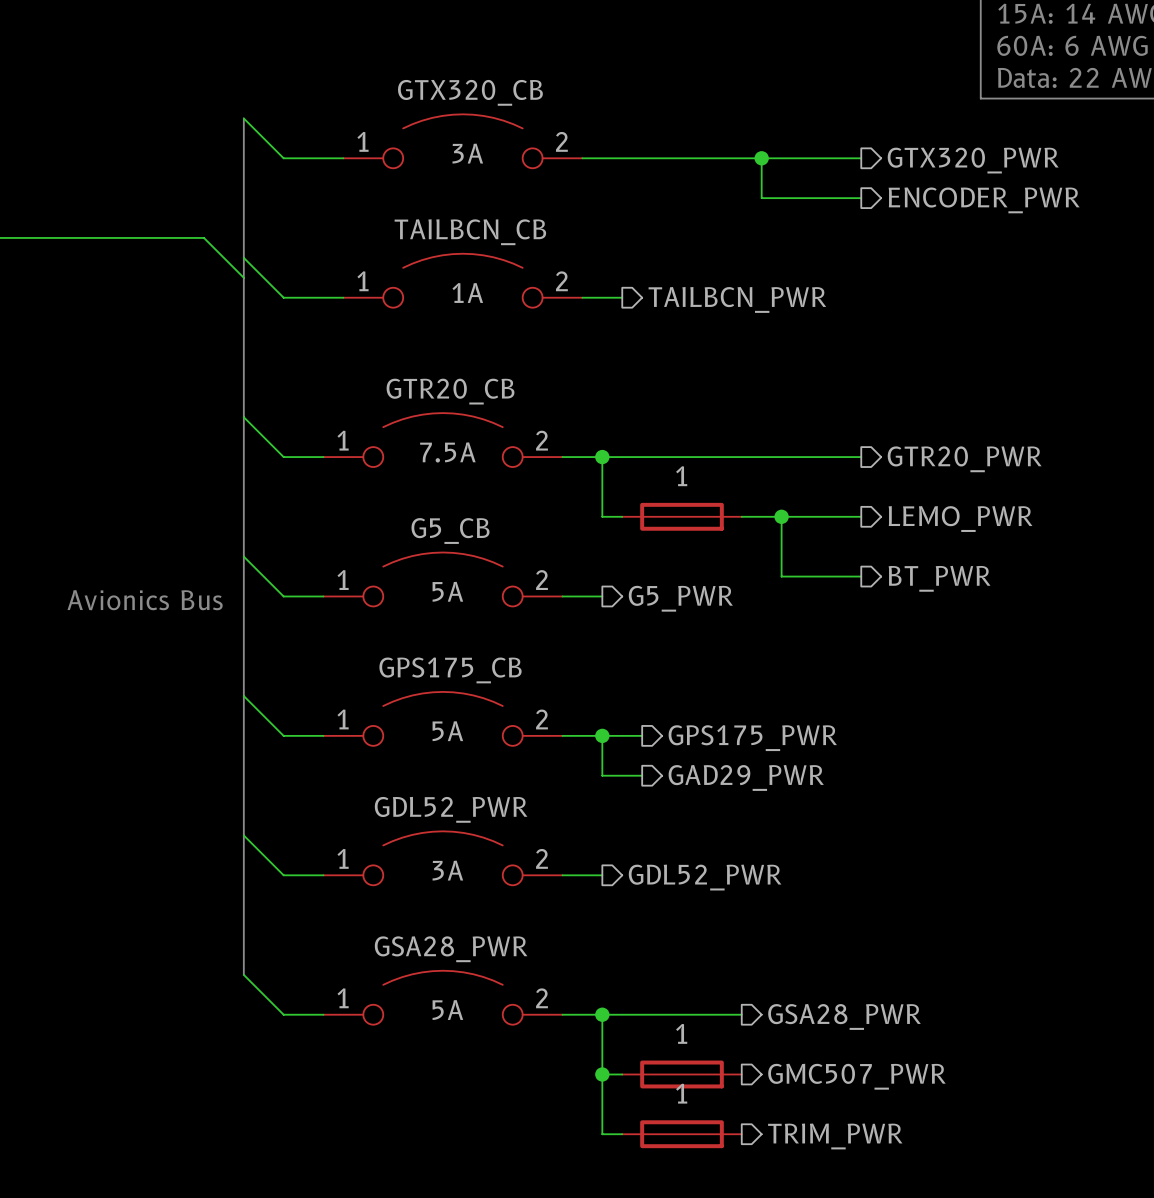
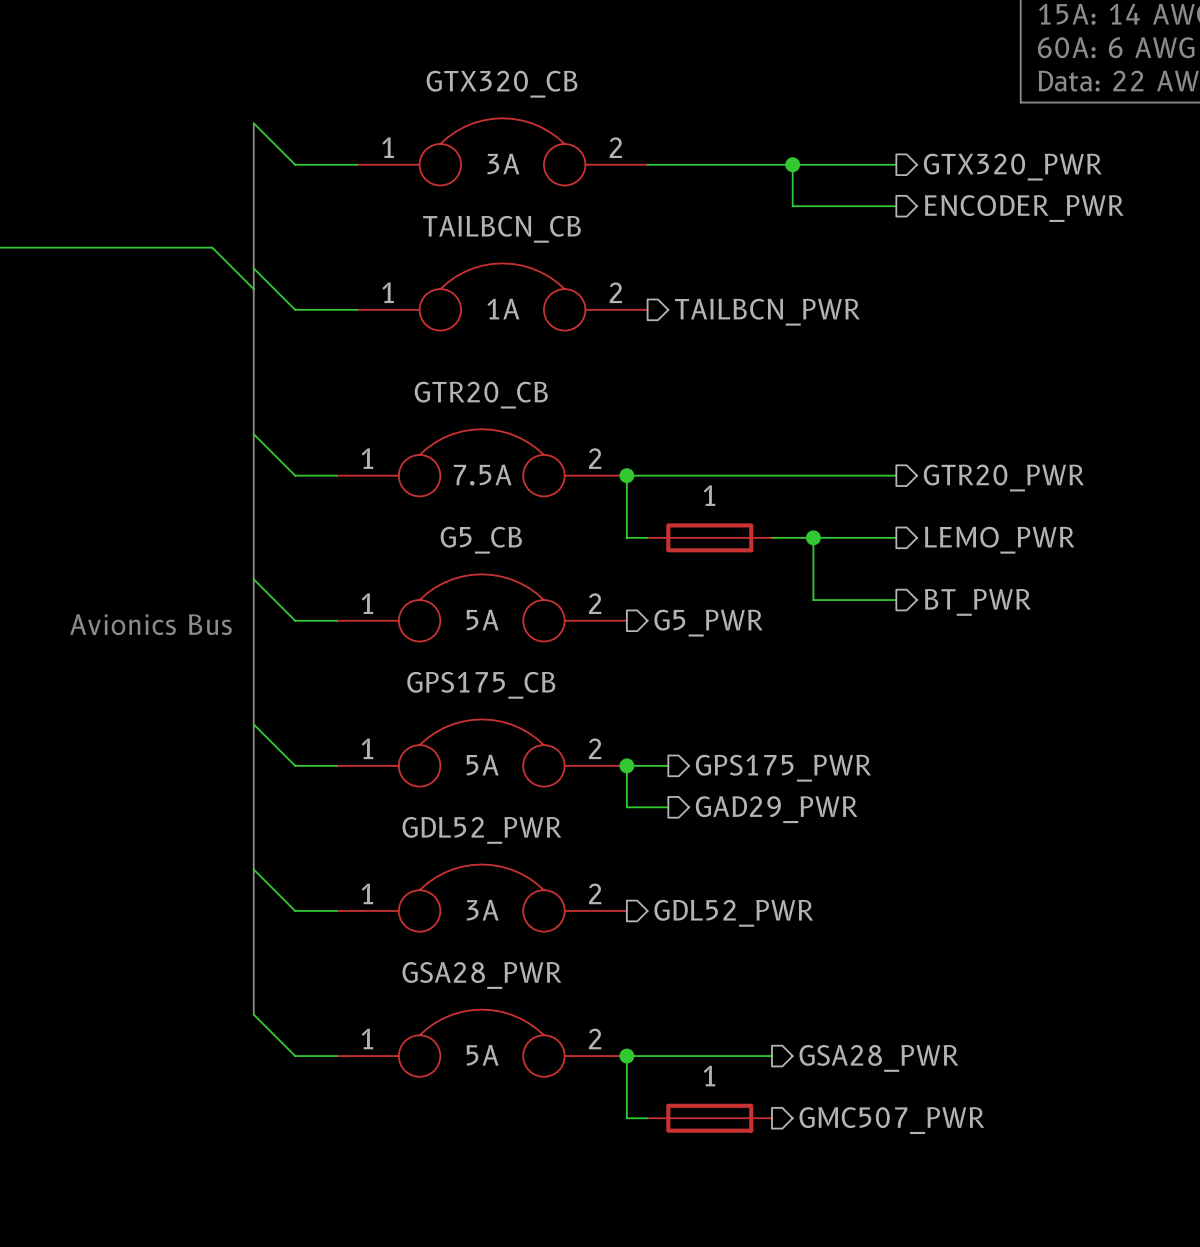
GTX320_CB symbol: [343, 114, 583, 169] -> [357, 118, 648, 186]
TAILBCN_CB: 1A (462, 280) -> none
TAILBCN_CB: none -> 1A (502, 296)
GTR20_CB symbol: [323, 413, 563, 468] -> [336, 429, 627, 497]
G5_CB symbol: [323, 552, 563, 607] -> [336, 574, 627, 642]
GPS175_CB symbol: [323, 691, 563, 746] -> [336, 719, 627, 787]
GDL52_PWR symbol: [323, 831, 563, 886] -> [336, 864, 627, 932]
GSA28_PWR symbol: [323, 970, 563, 1025] -> [336, 1009, 627, 1077]
wire: (602, 1074) (602, 1134) (622, 1134) -> none
junction: (602, 1074) -> none
part: 1 (682, 1134) -> none
hierarchical label: TRIM_PWR (835, 1136) -> none

